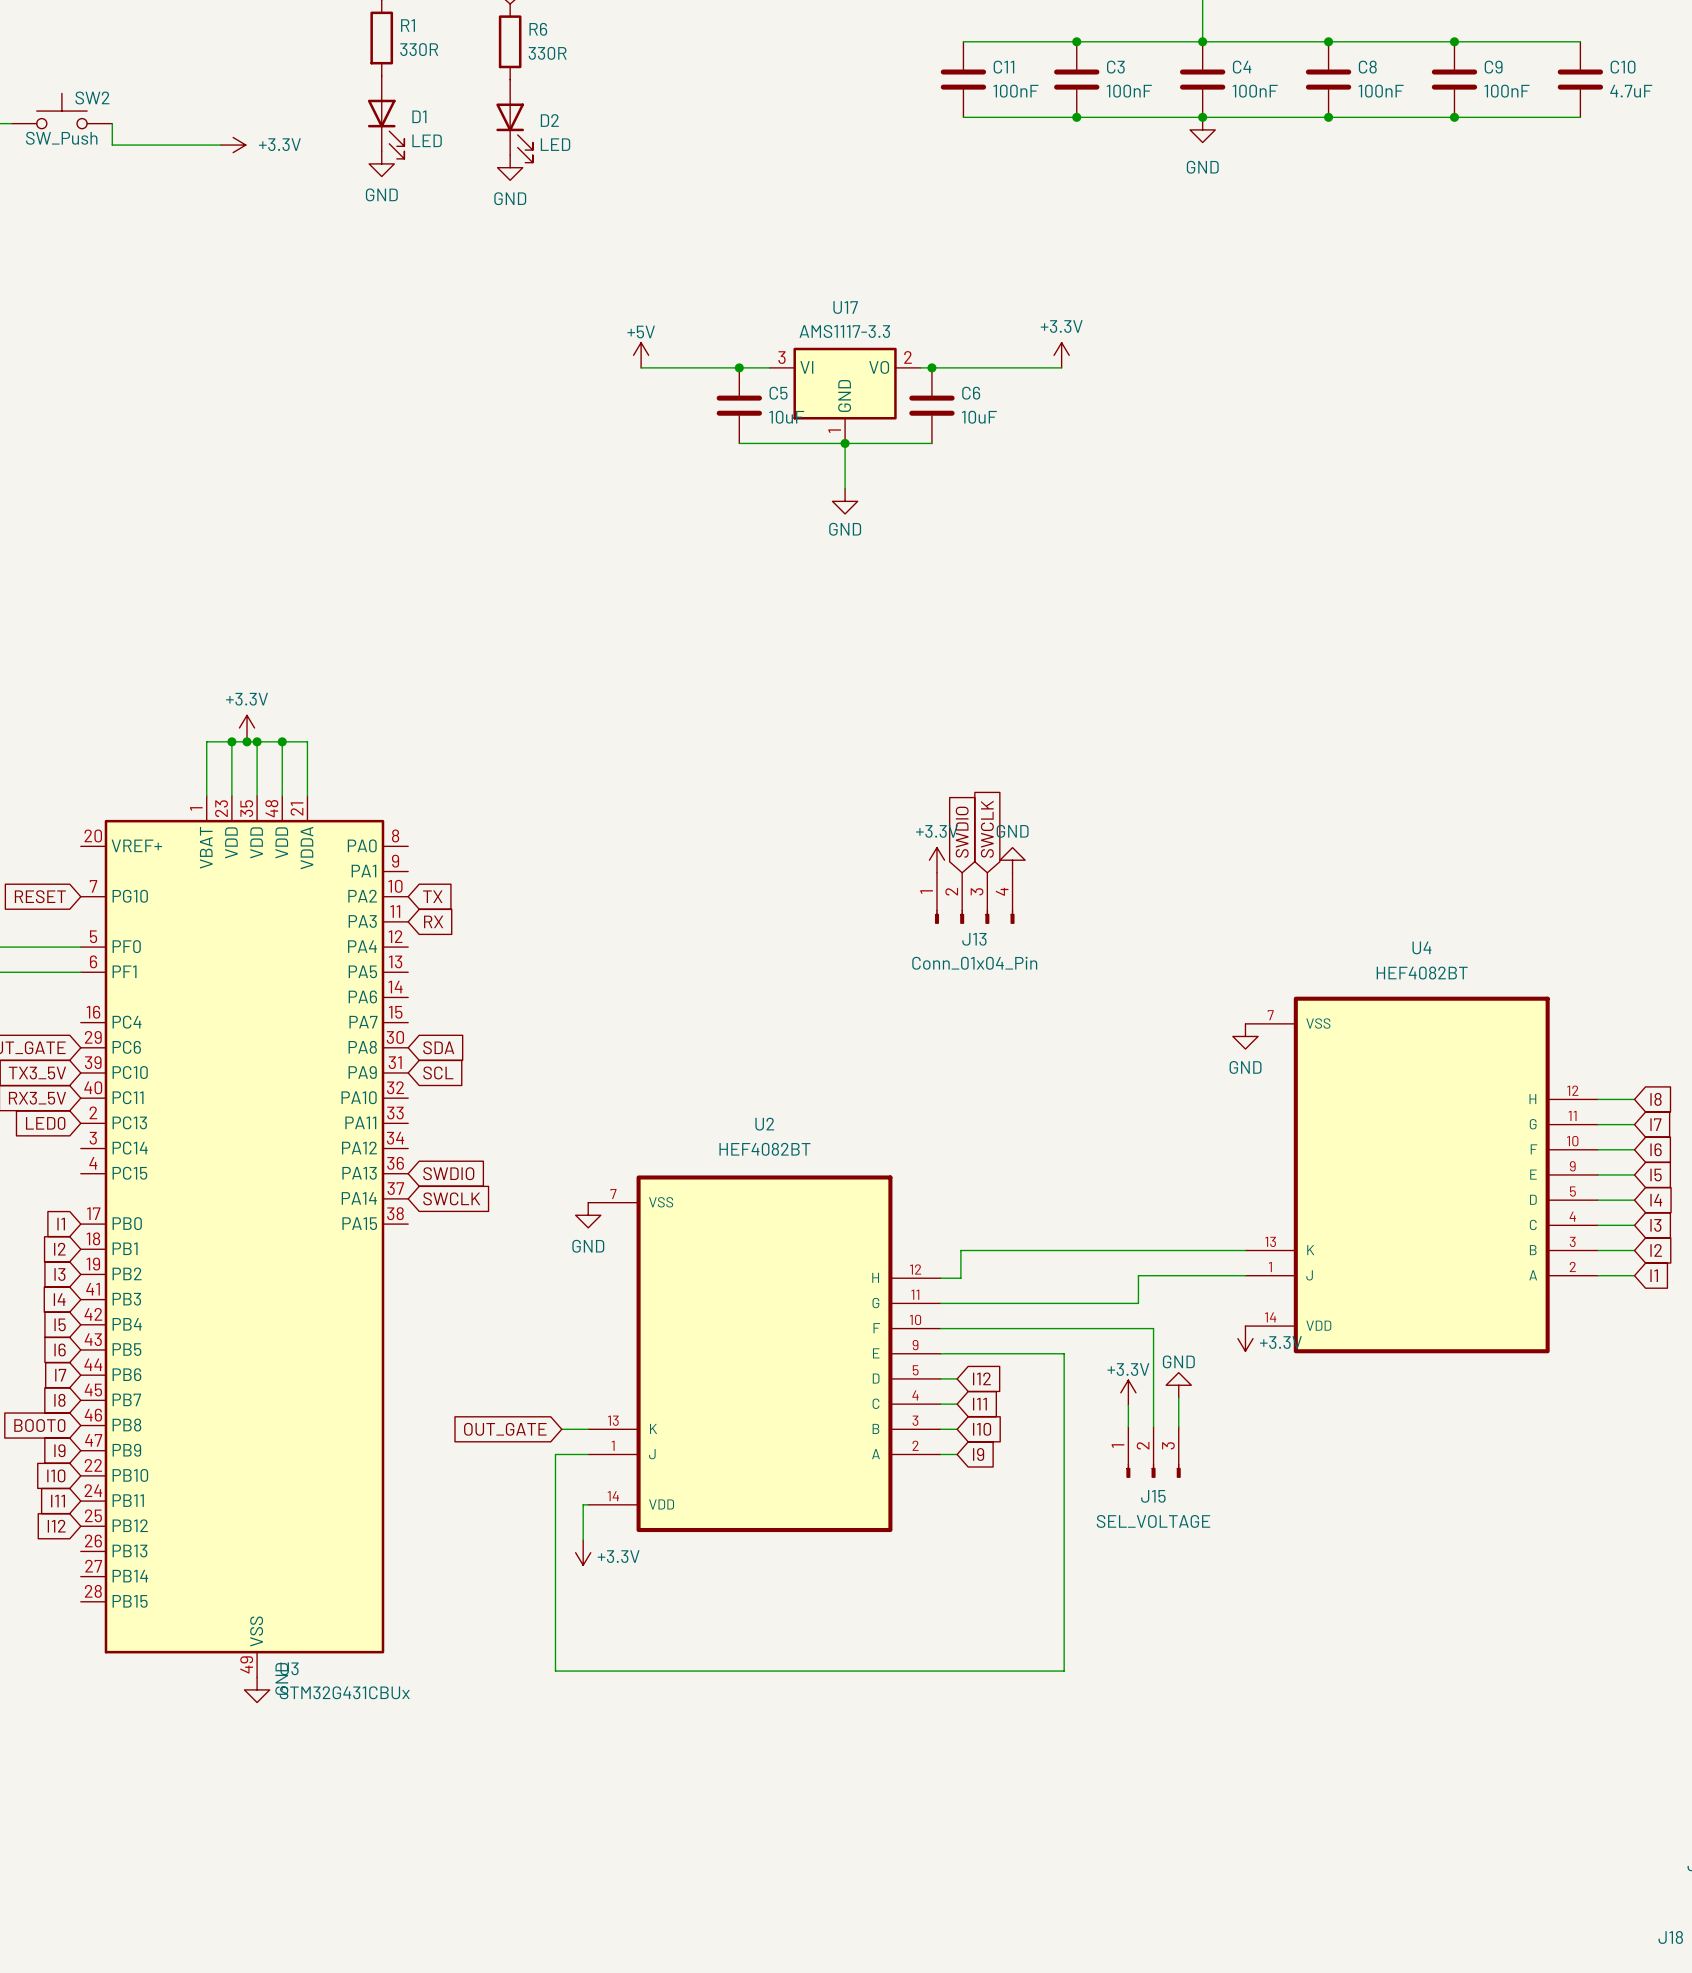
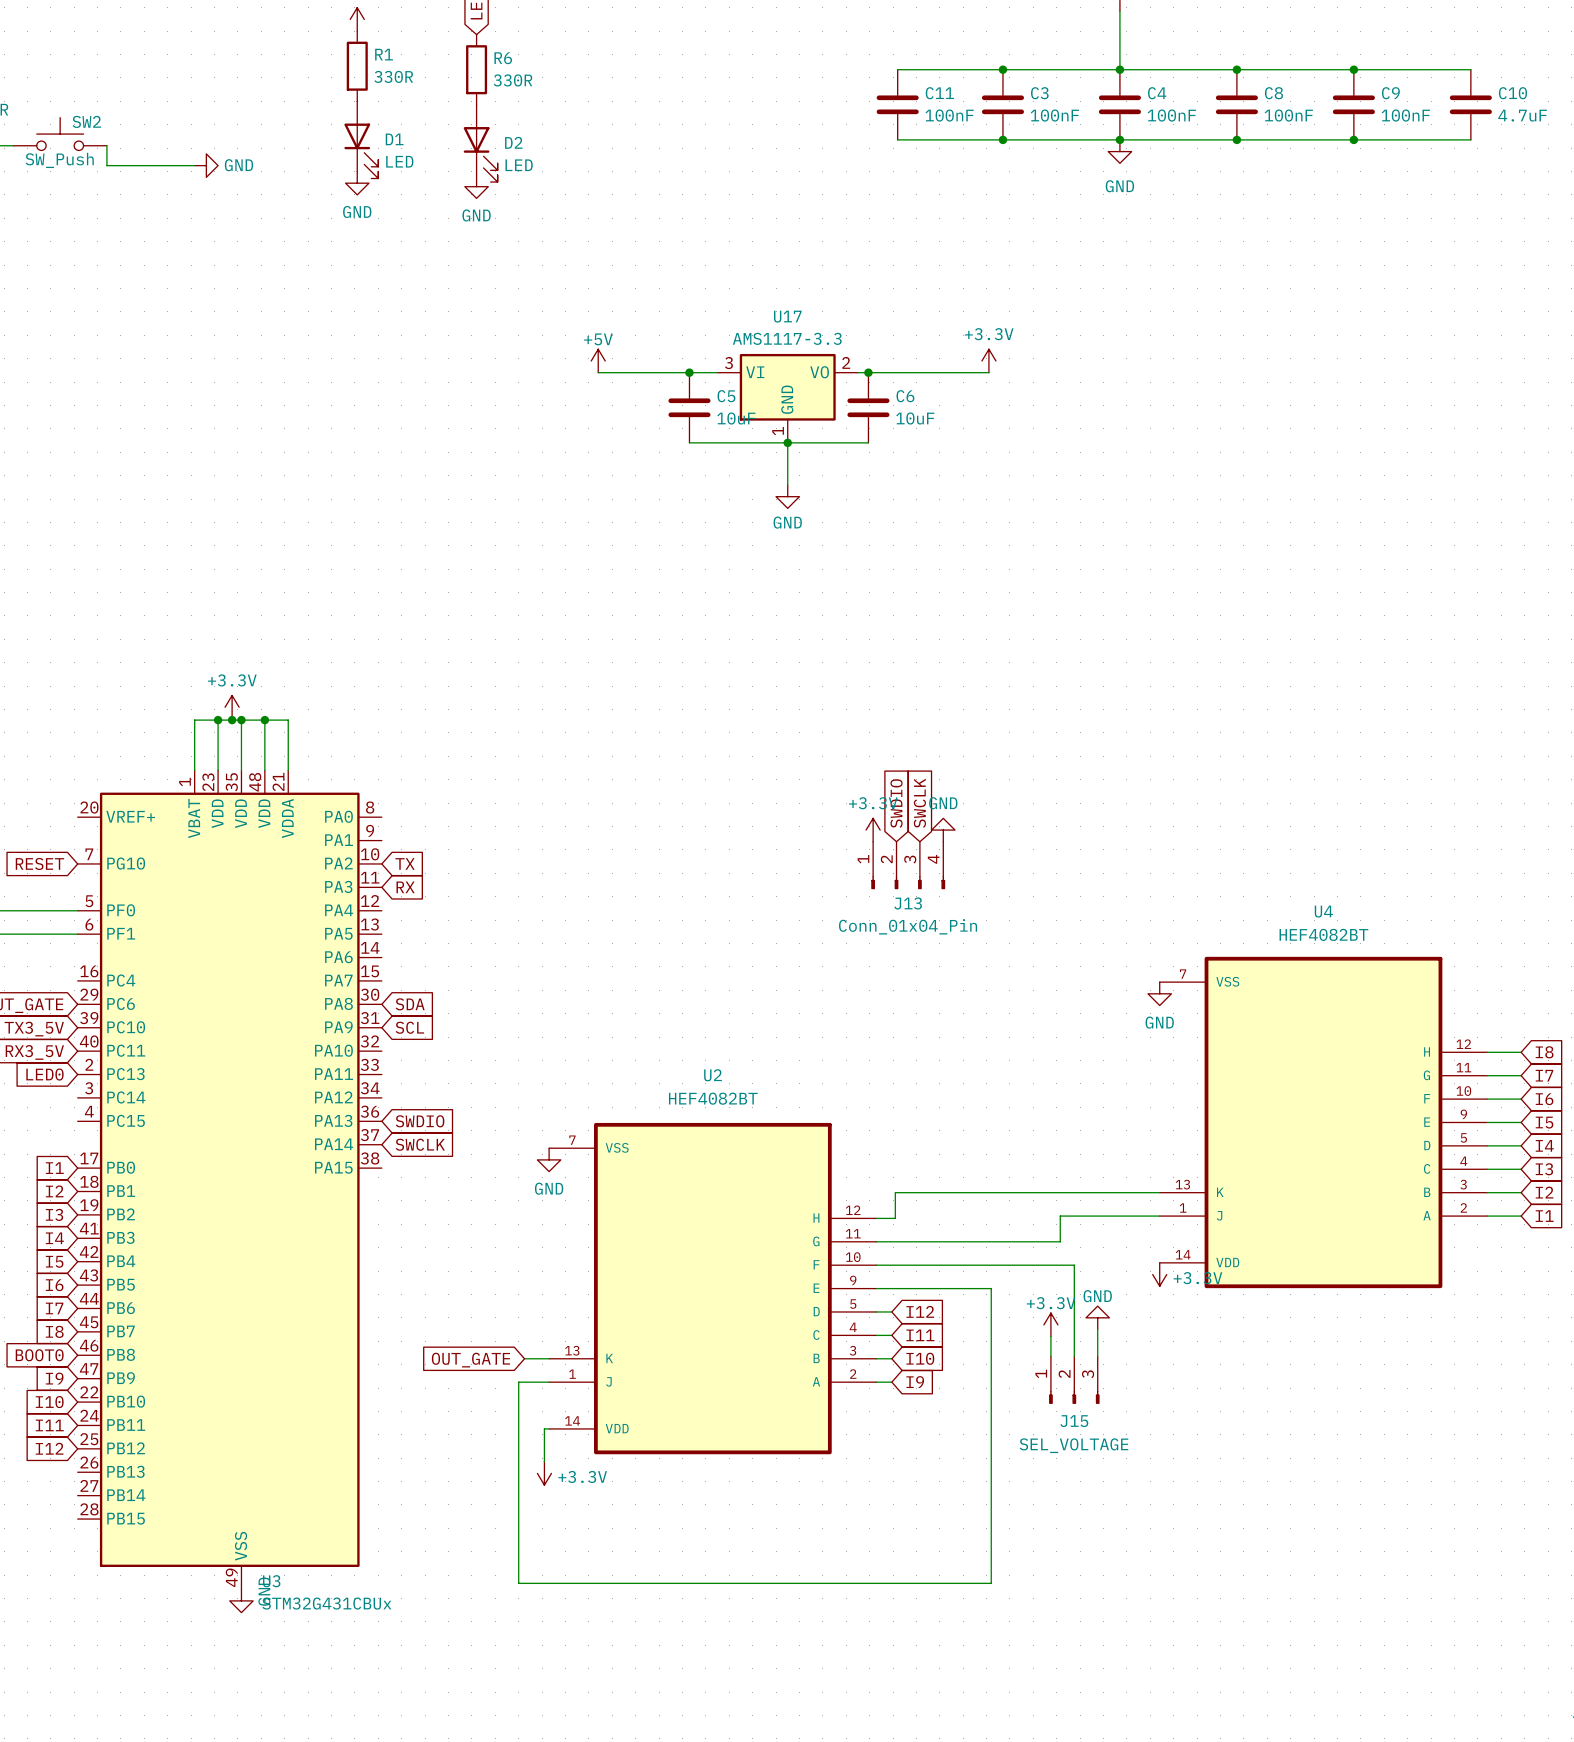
power symbol: none -> GND (206, 165)
power symbol: +3.3V (233, 145) -> none

